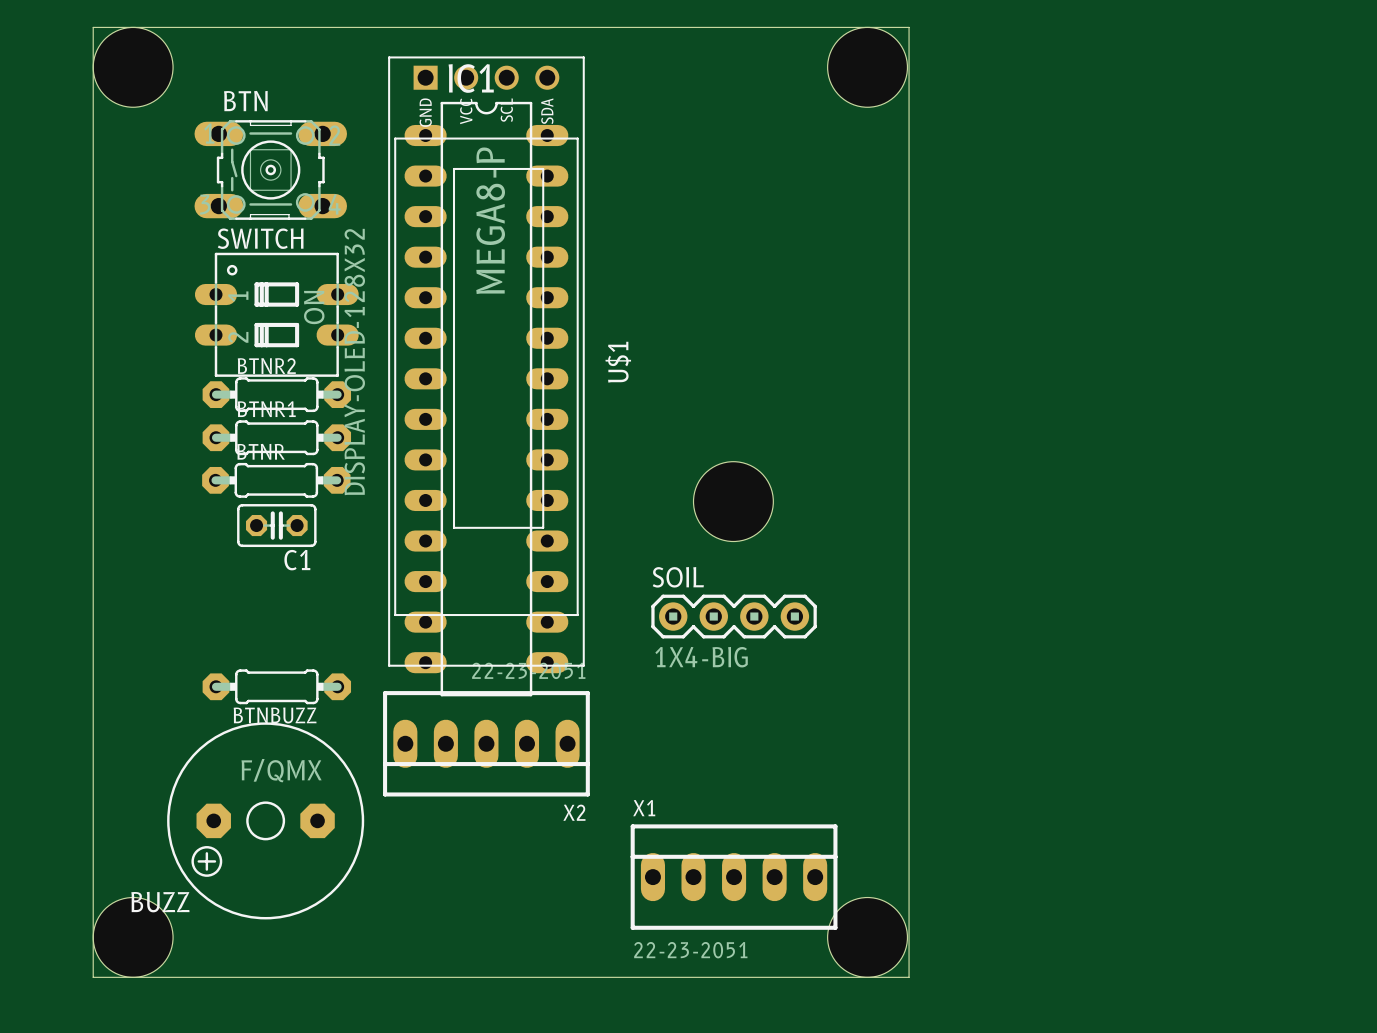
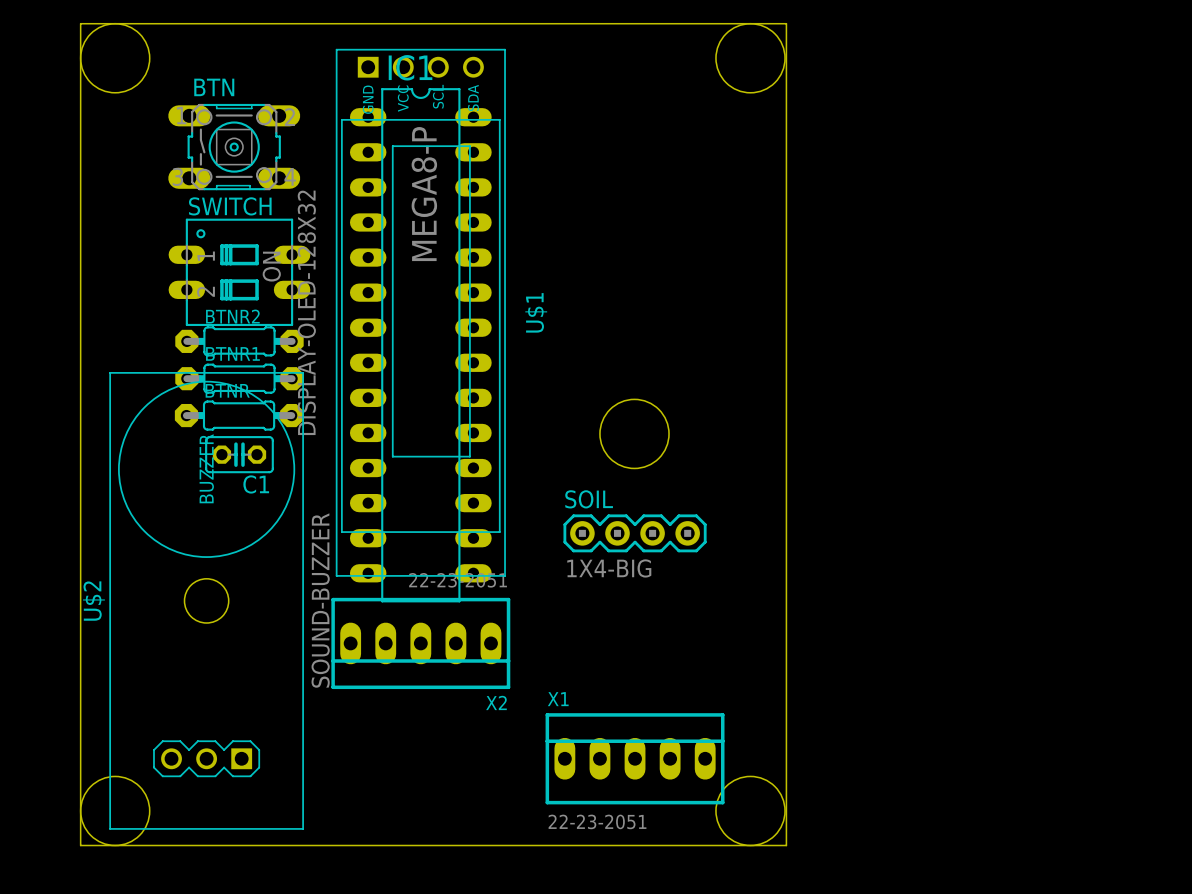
BTNBUZZ: (276, 686) -> none
U$2: none -> SOUND-BUZZER (206, 600)
BUZZ: F/QMX (265, 820) -> none

